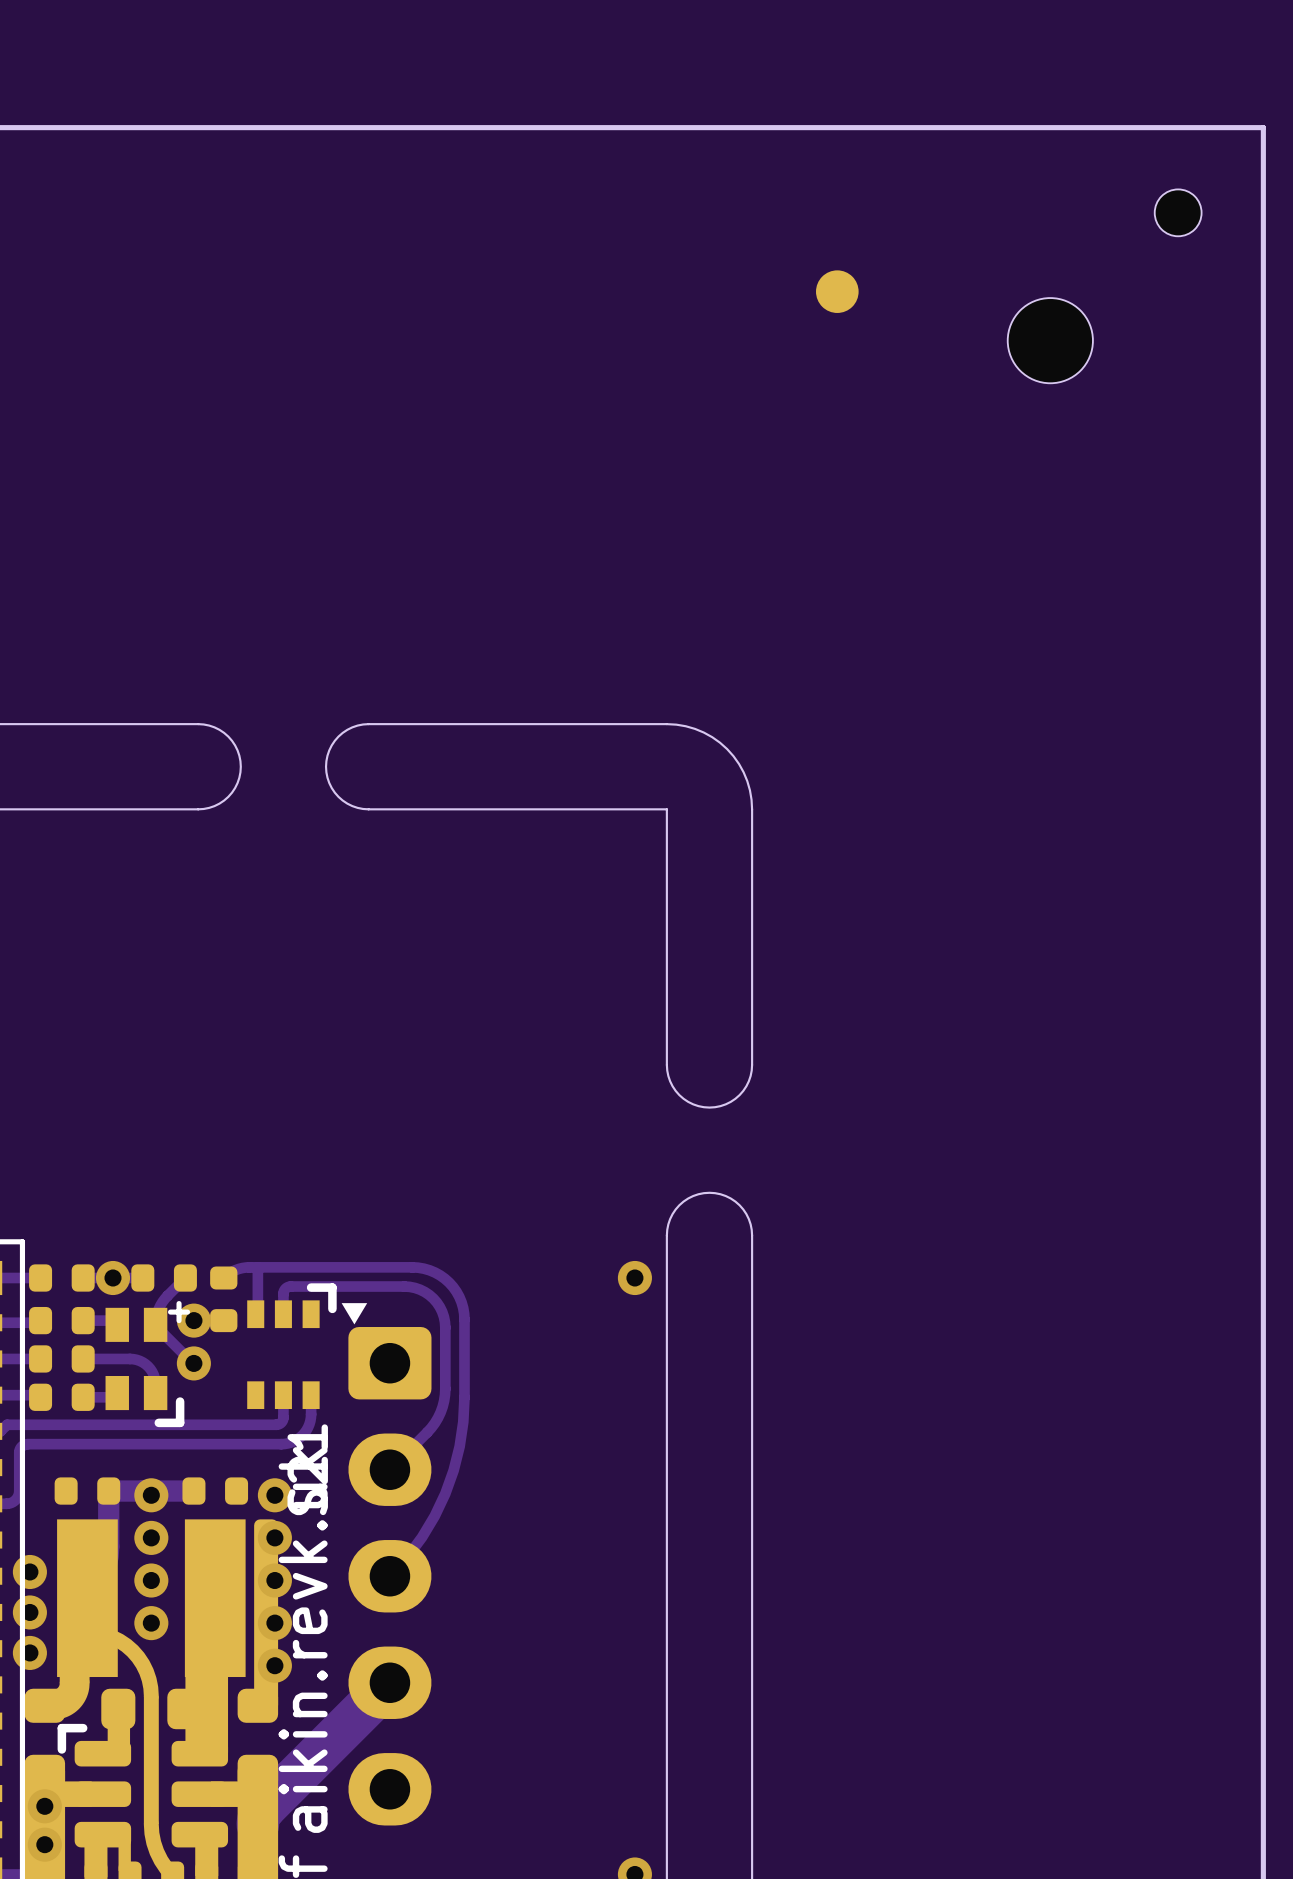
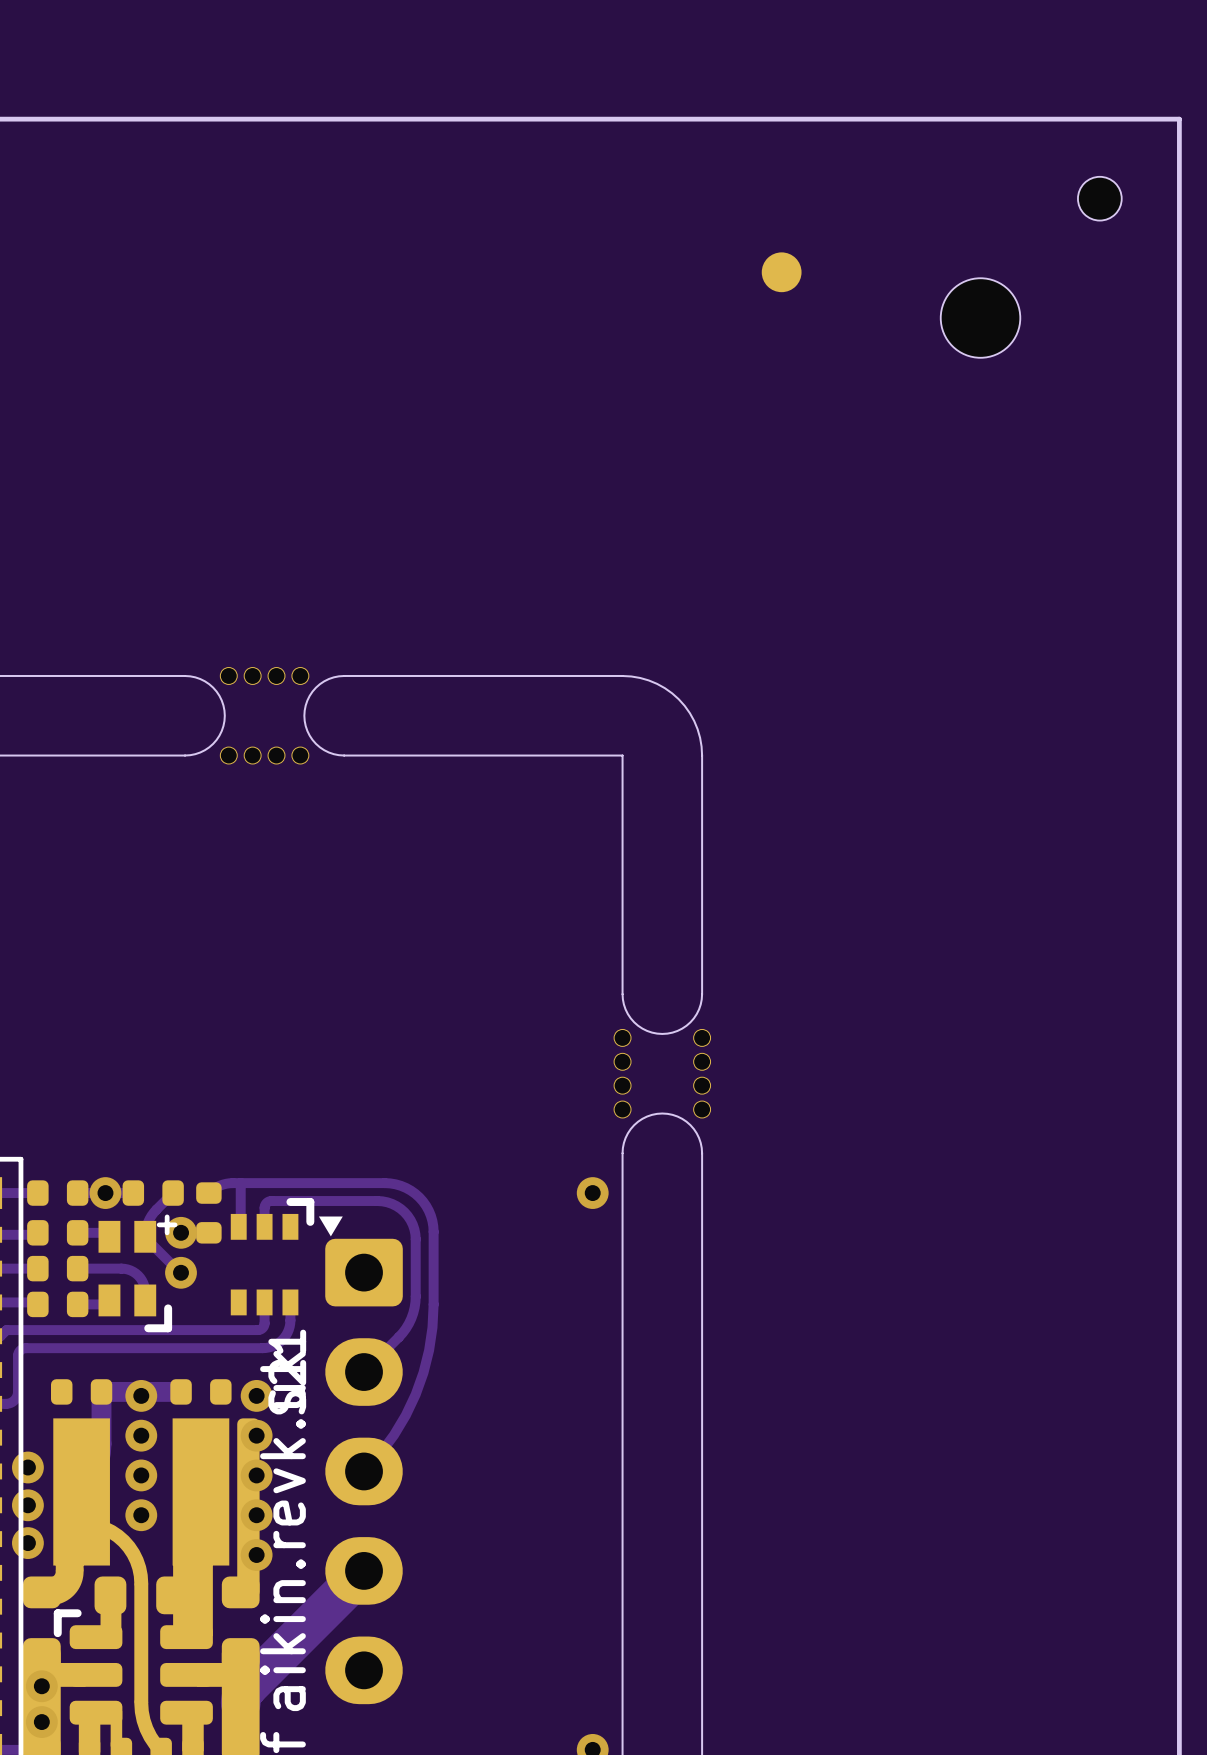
part: none -> (264, 715)
part: none -> (662, 1073)

